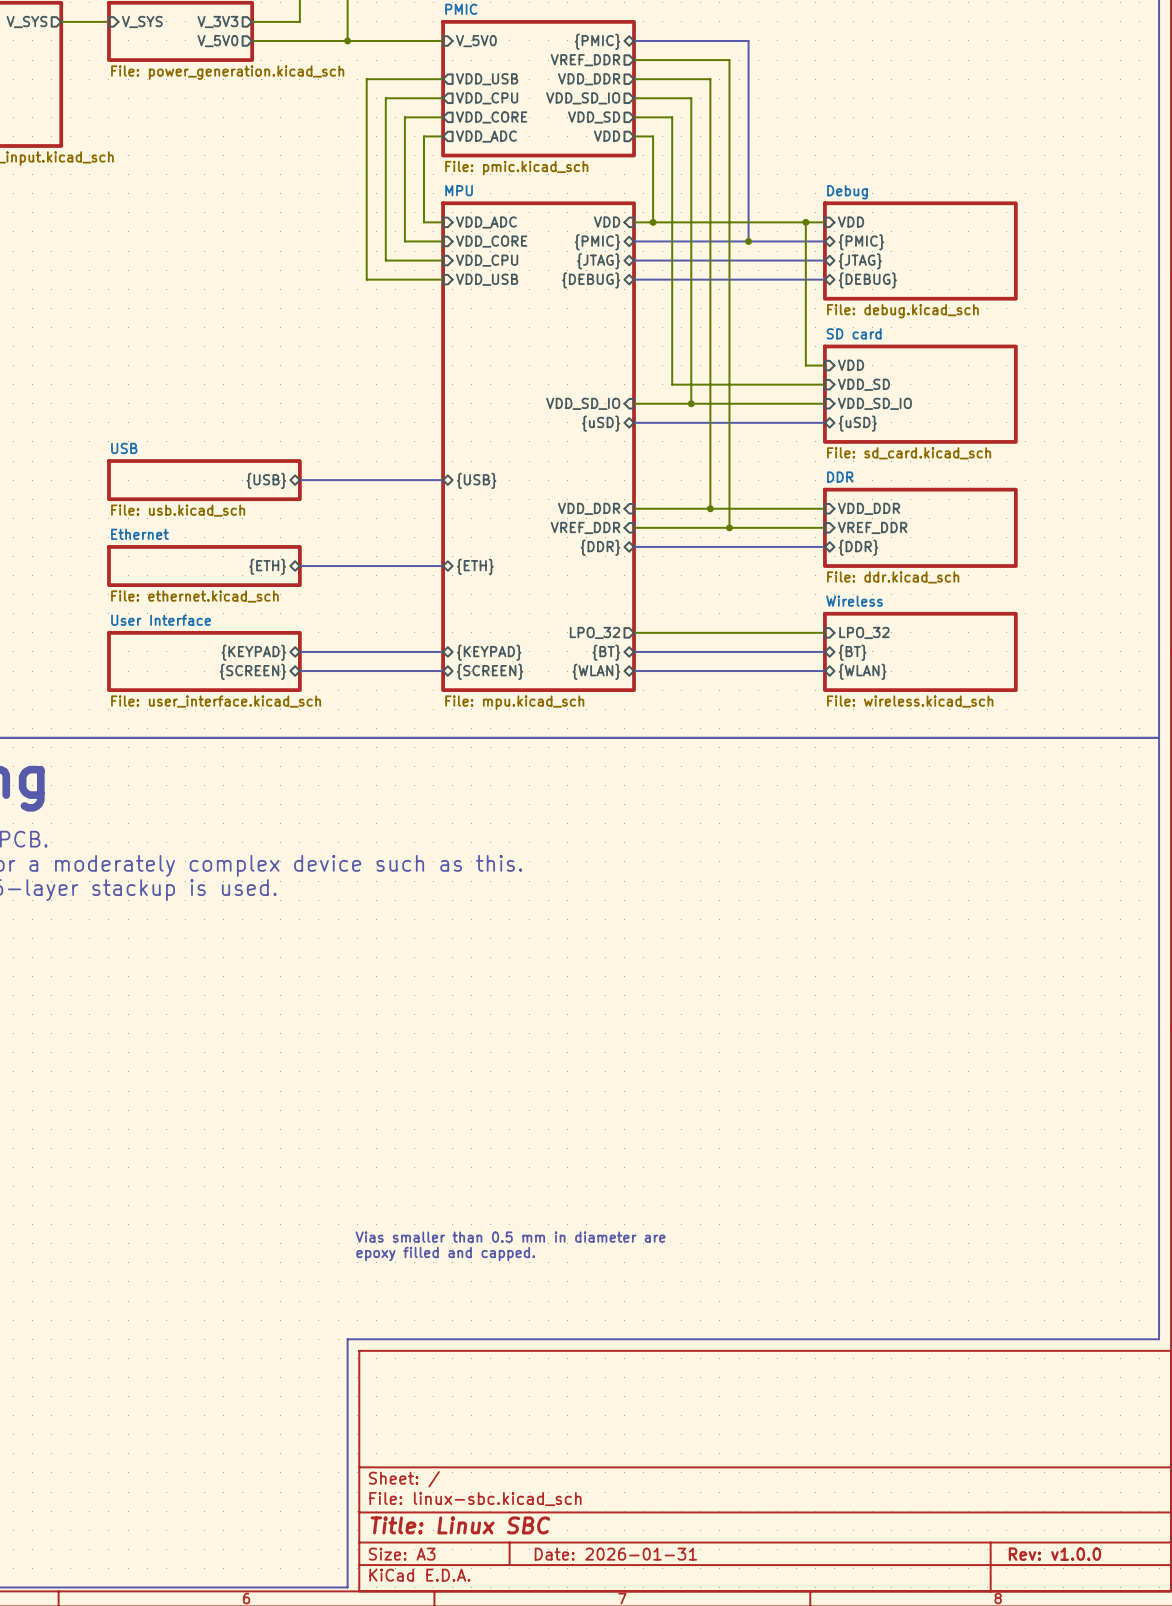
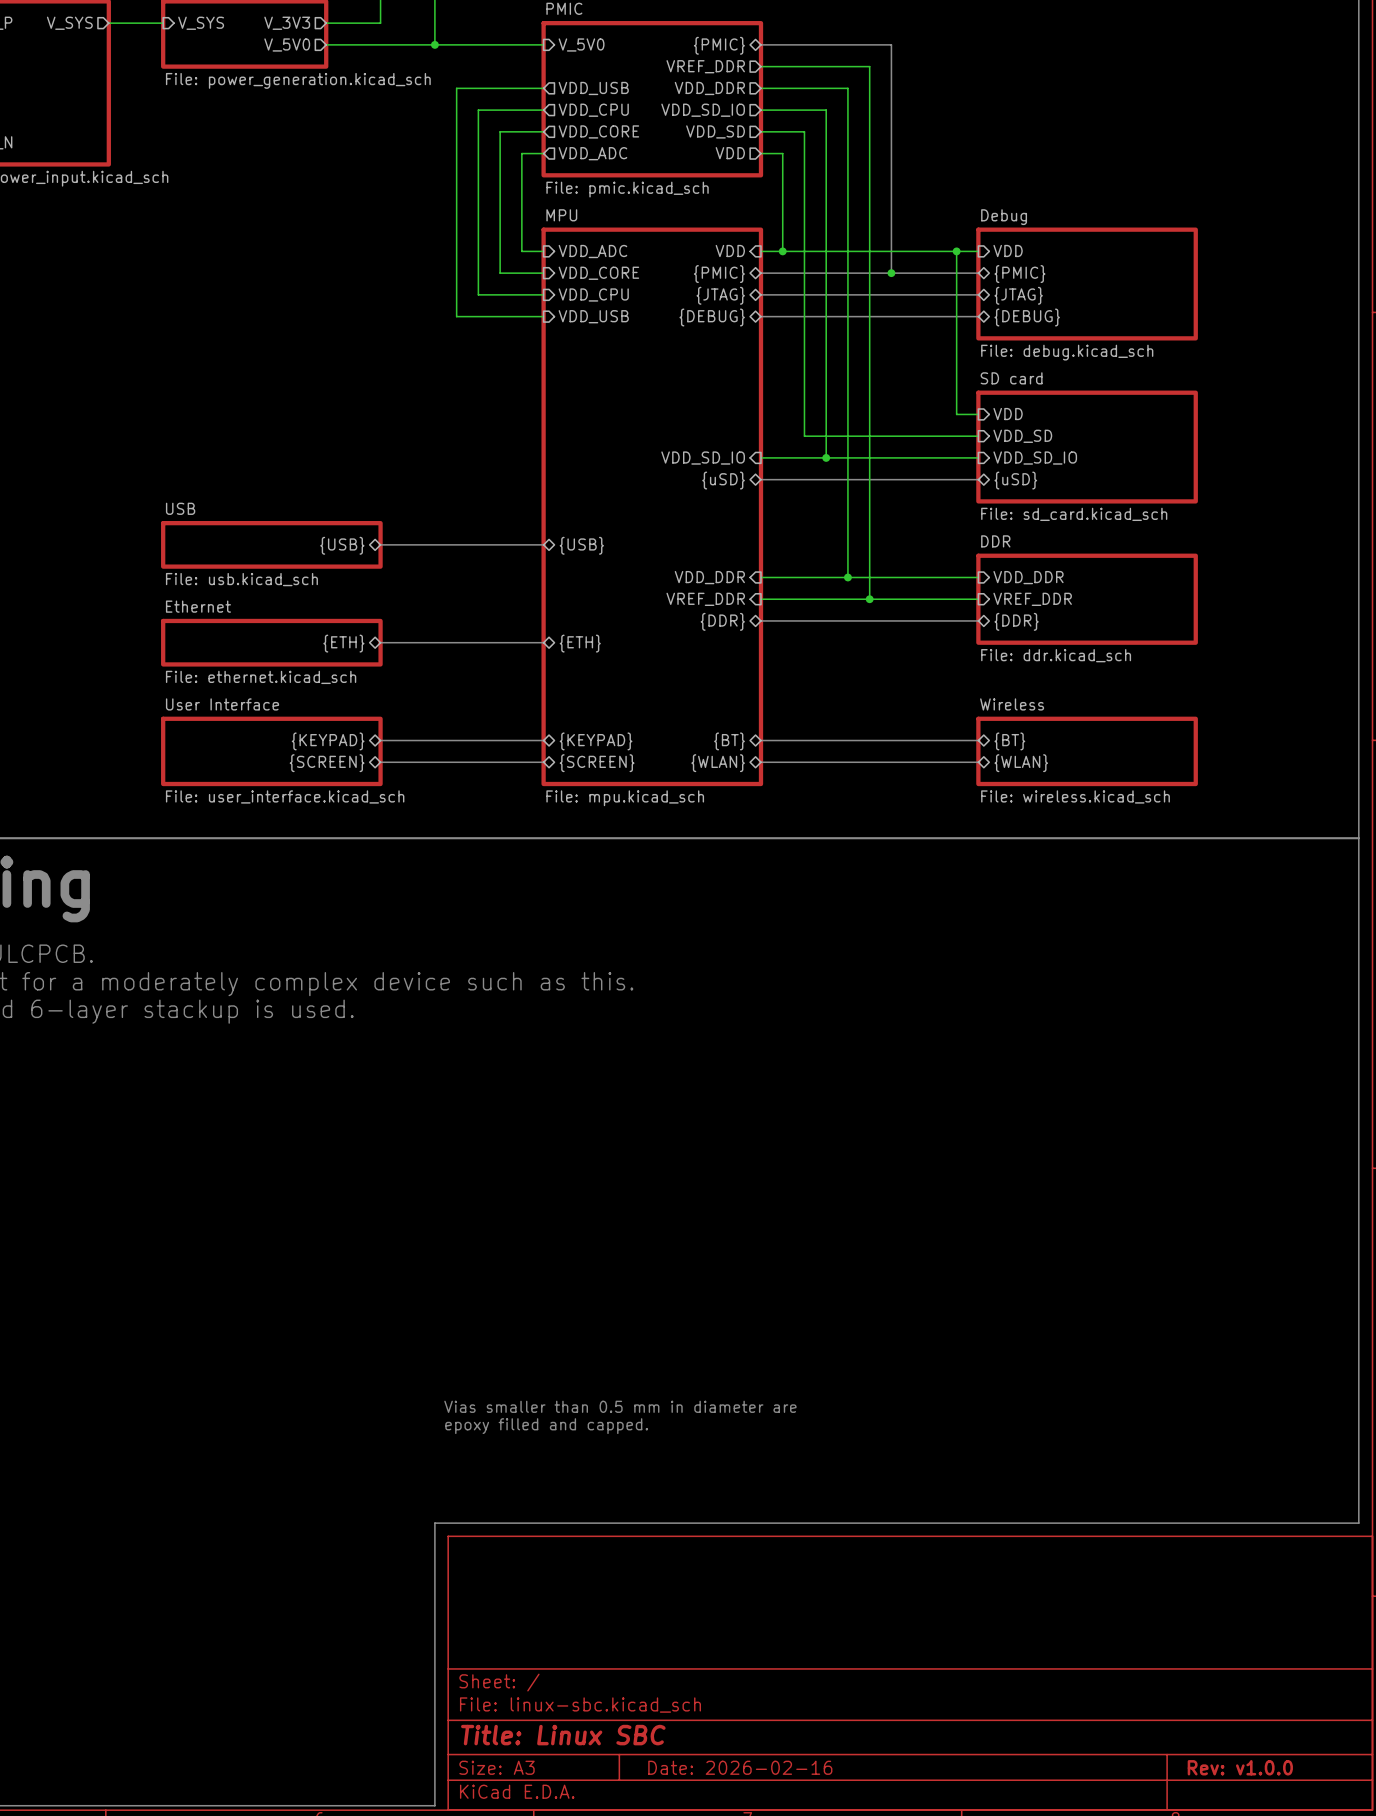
sheet pin: LPO_32 (594, 632) -> none
wire: (634, 632) (824, 632) -> none
sheet pin: LPO_32 (864, 632) -> none
sheet Wireless: File: wireless.kicad_sch (920, 651) -> none
sheet Wireless: none -> File: wireless.kicad_sch (1087, 751)
title block: Date: 2026-01-31 (615, 1554) -> Date: 2026-02-16 (740, 1767)

